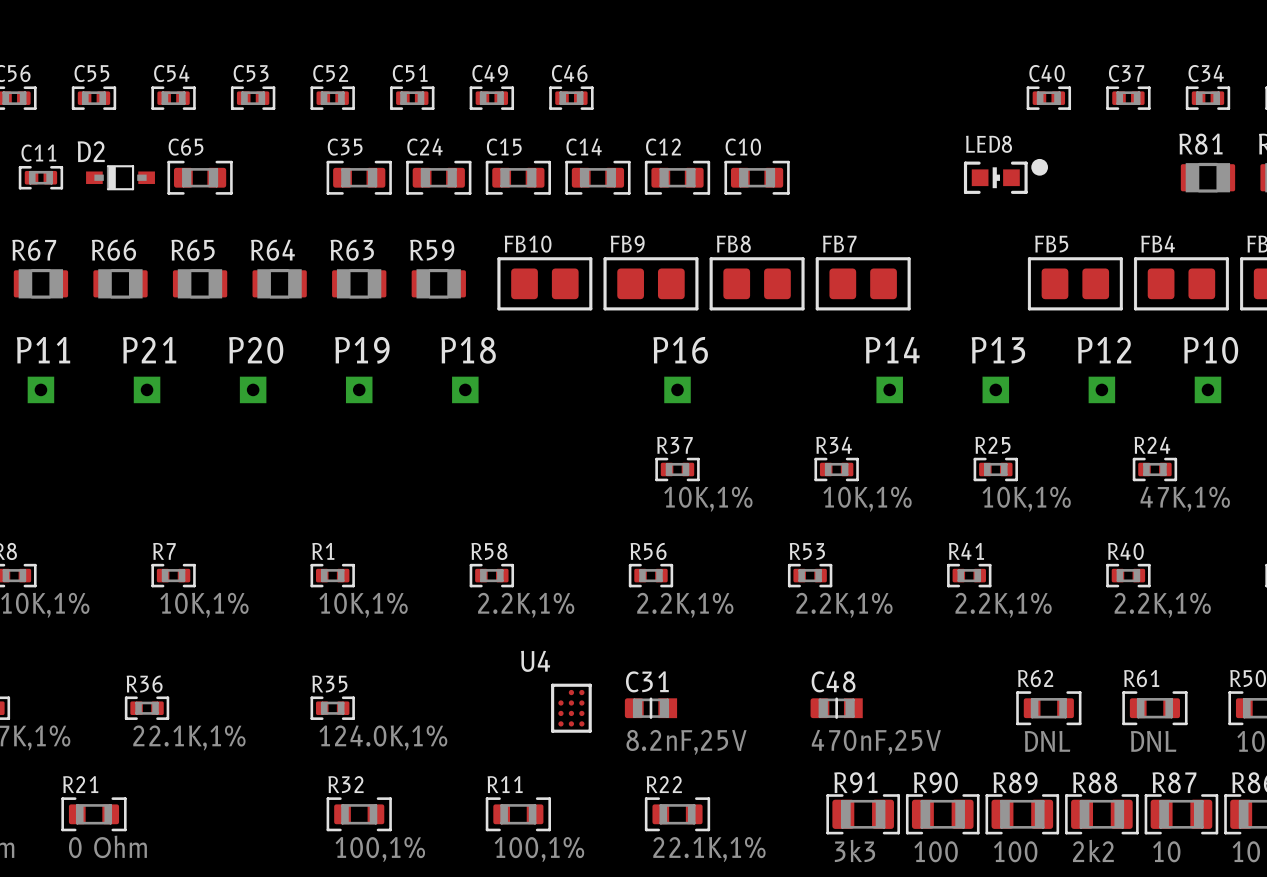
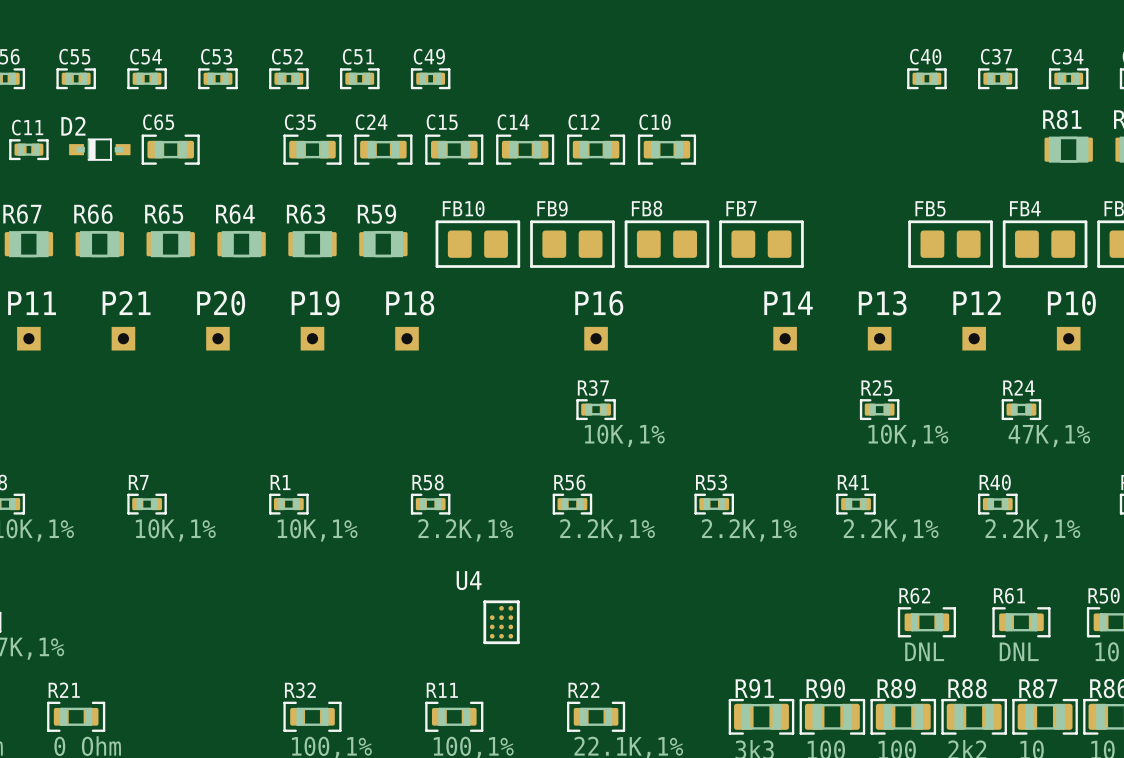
C46: (571, 98) -> none
LED8: (1005, 176) -> none
R34: 10K,1% (836, 469) -> none
R36: 22.1K,1% (147, 708) -> none
R35: 124.0K,1% (332, 708) -> none
C31: 8.2nF,25V (650, 708) -> none
C48: 470nF,25V (836, 708) -> none

